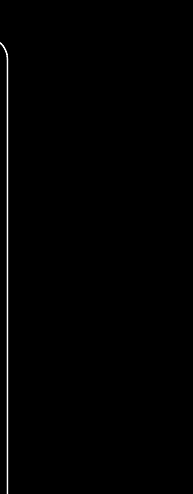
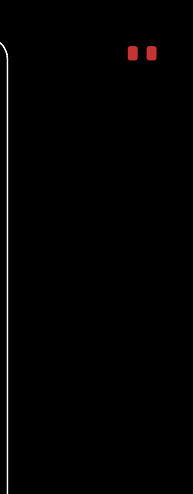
part: none -> (142, 53)

